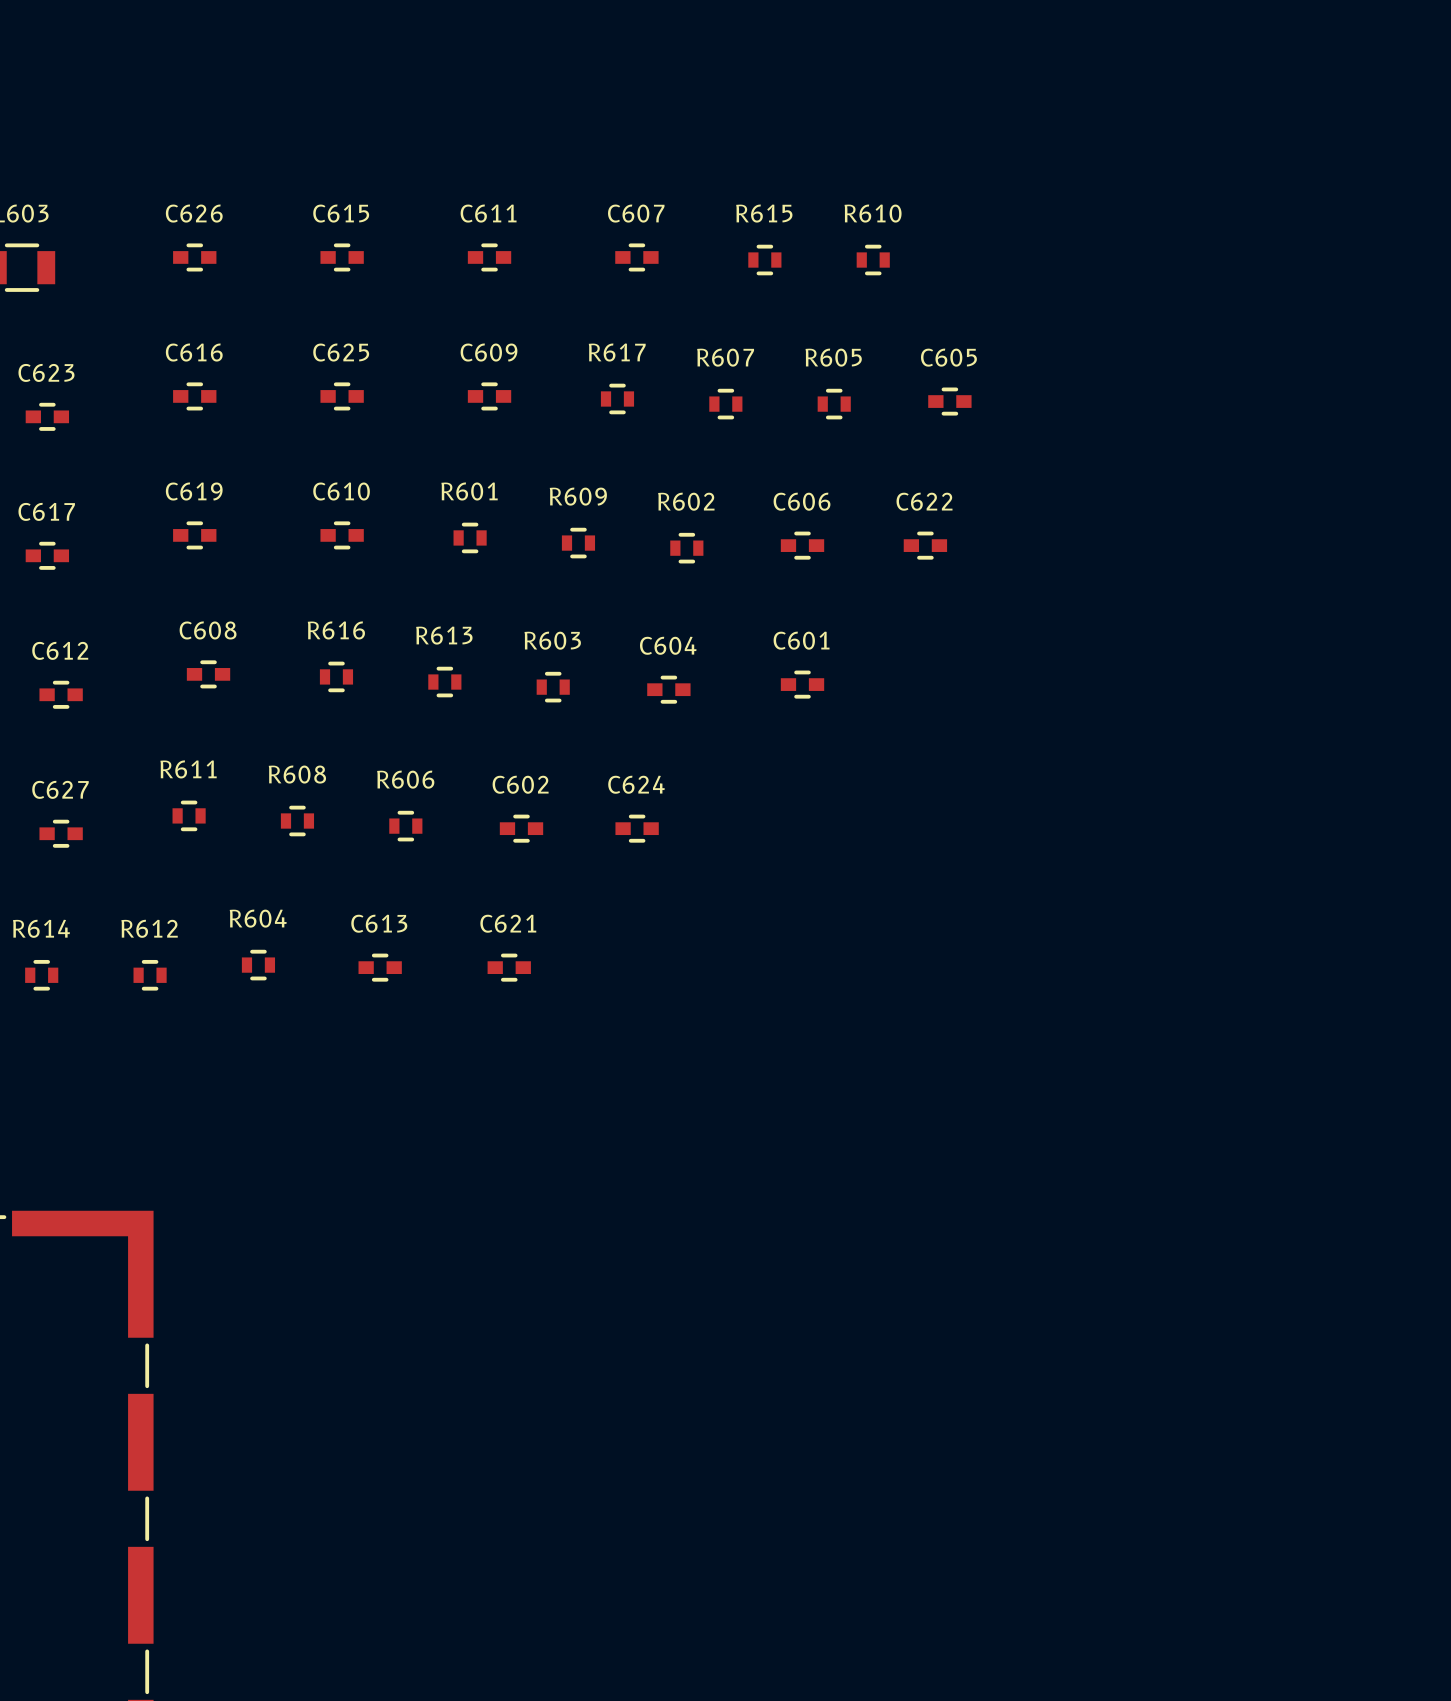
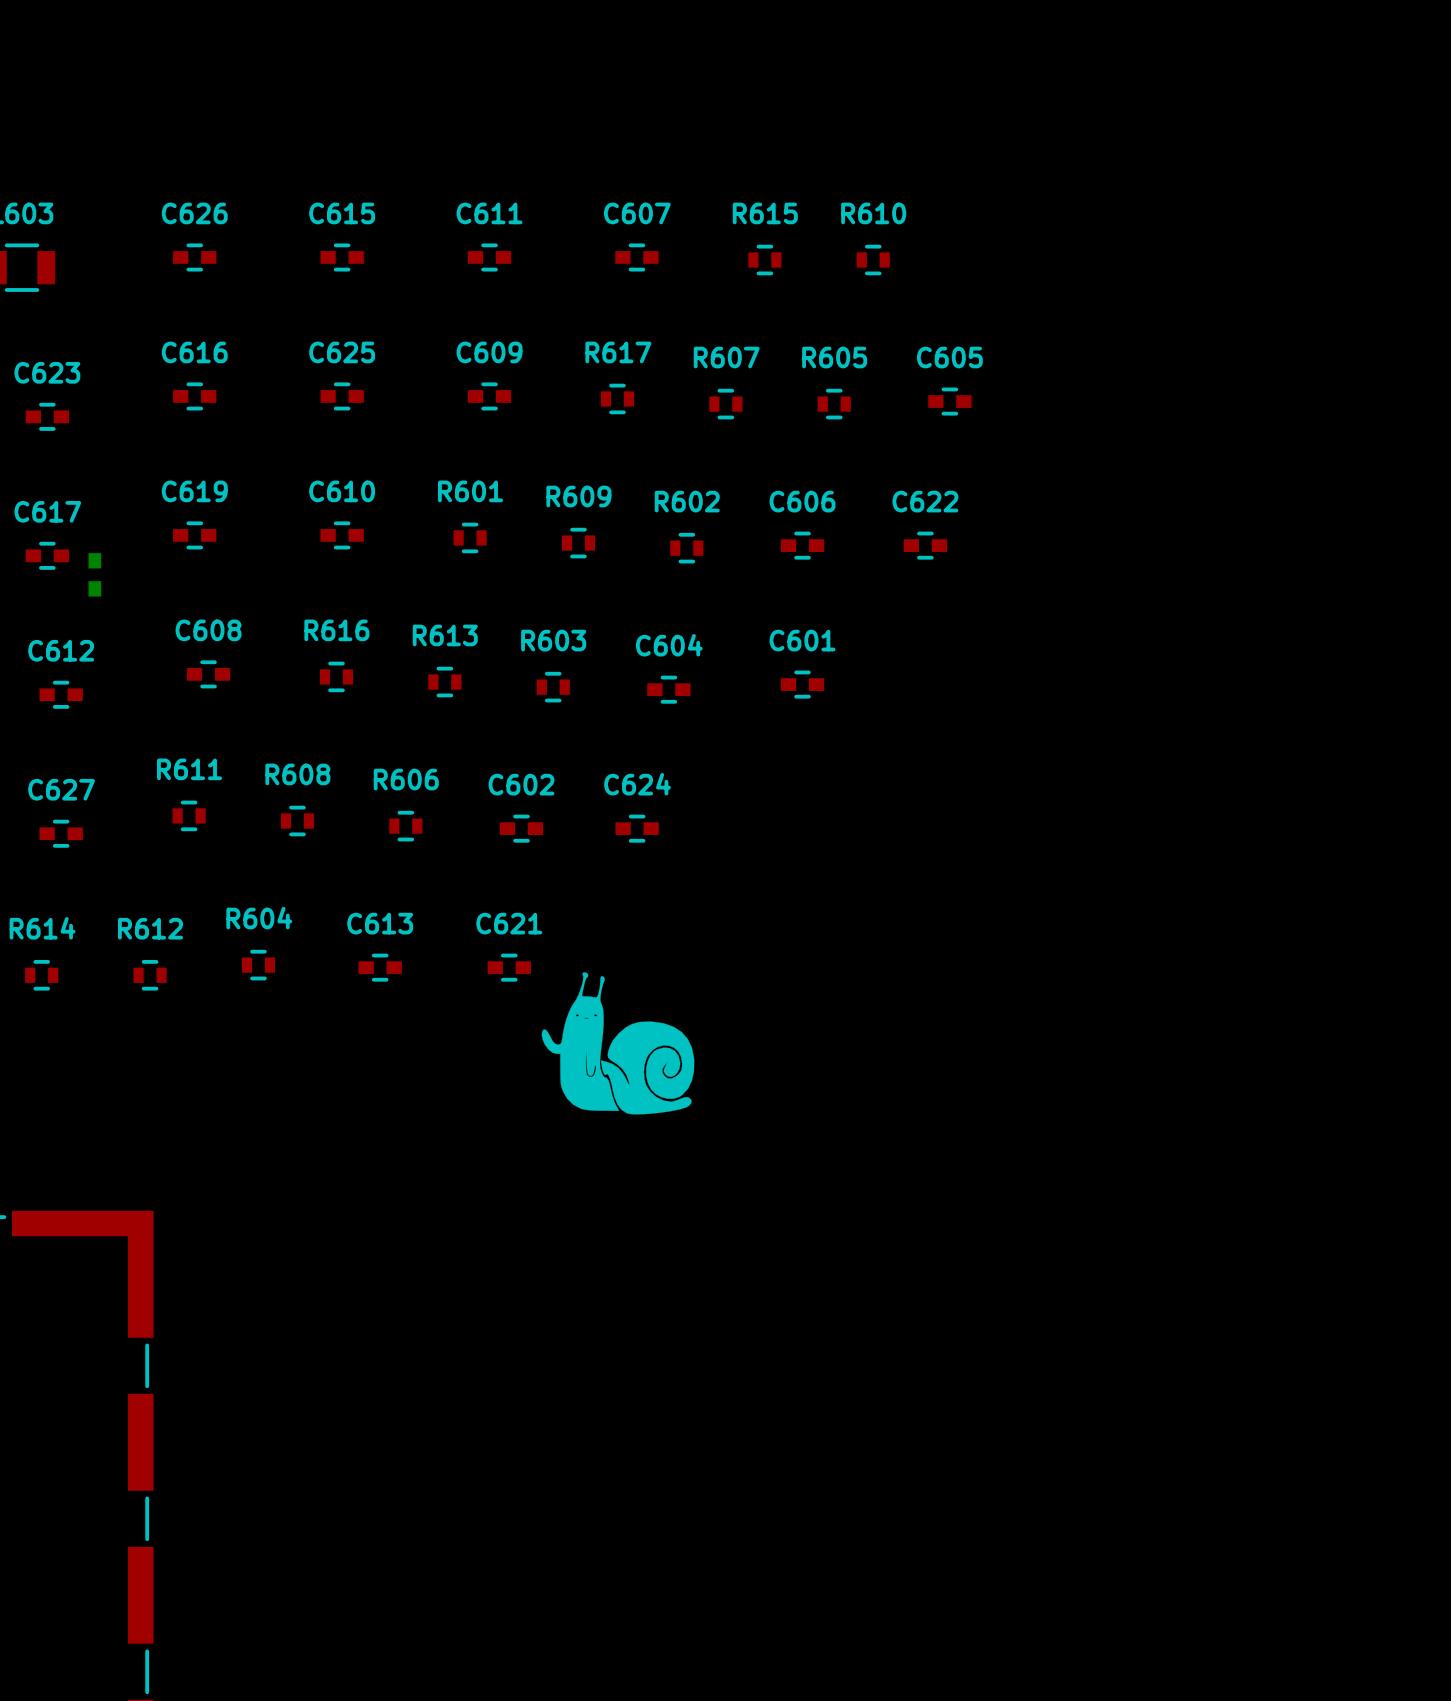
part: none -> (94, 574)
drawing: none -> [541, 972, 695, 1115]

